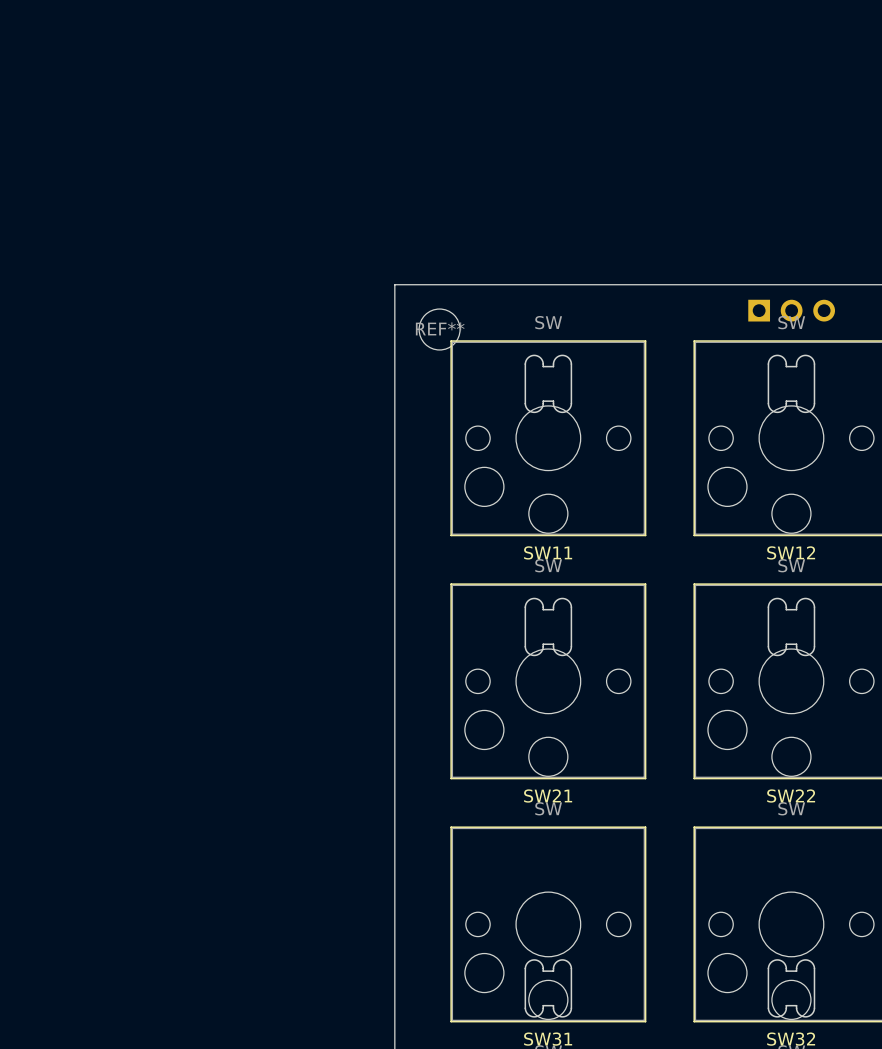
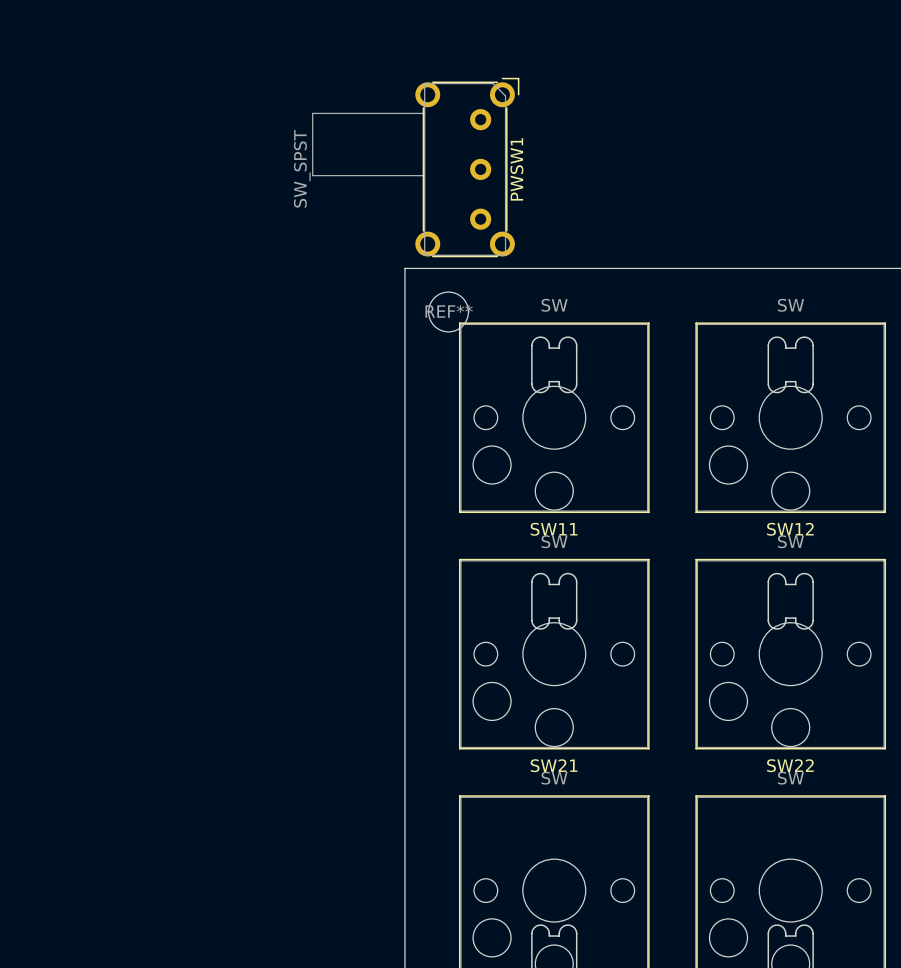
PWSW1: none -> SW_SPST (415, 167)
part: (791, 310) -> none

